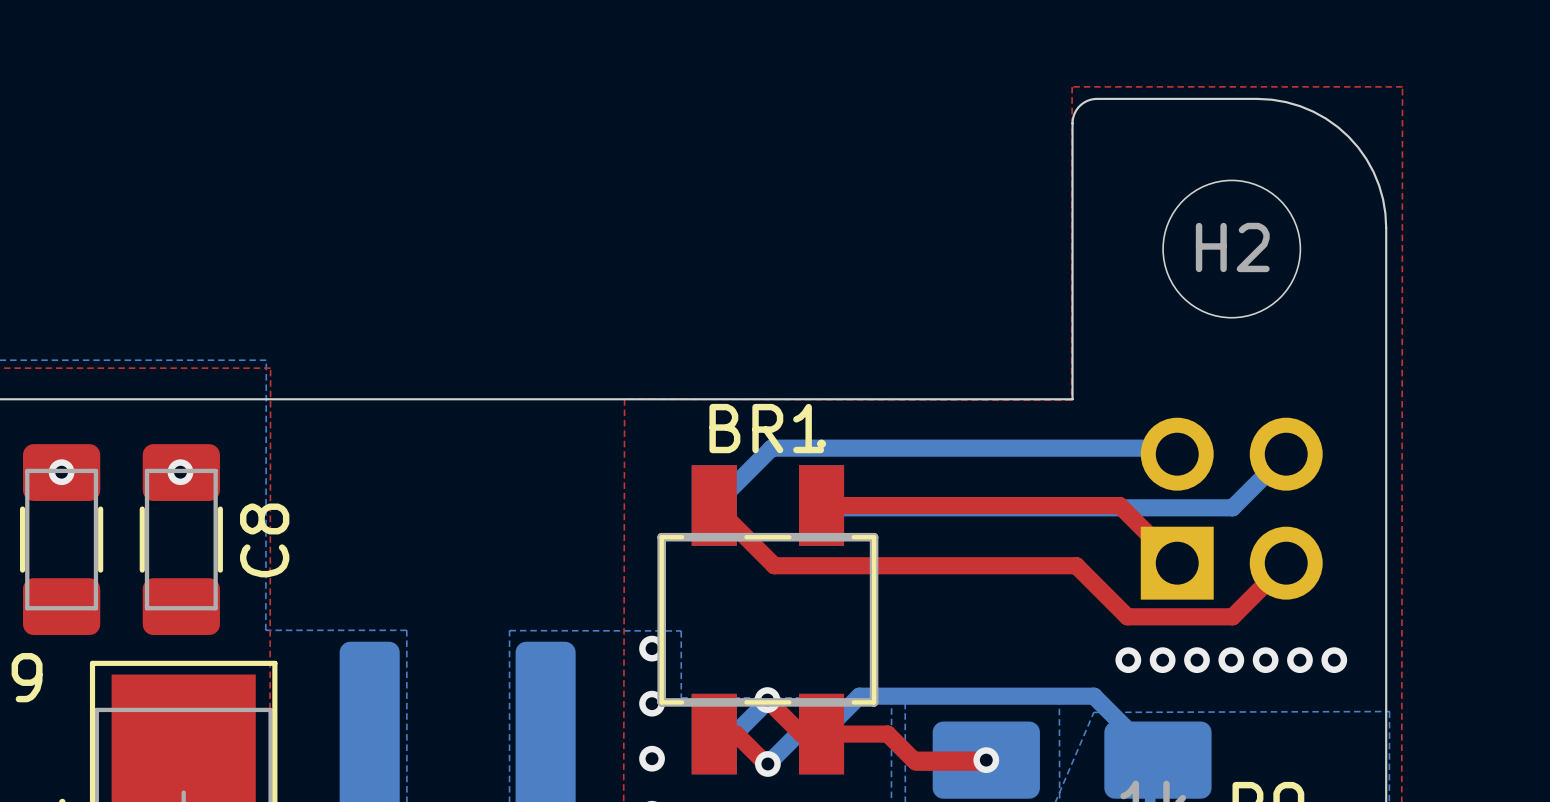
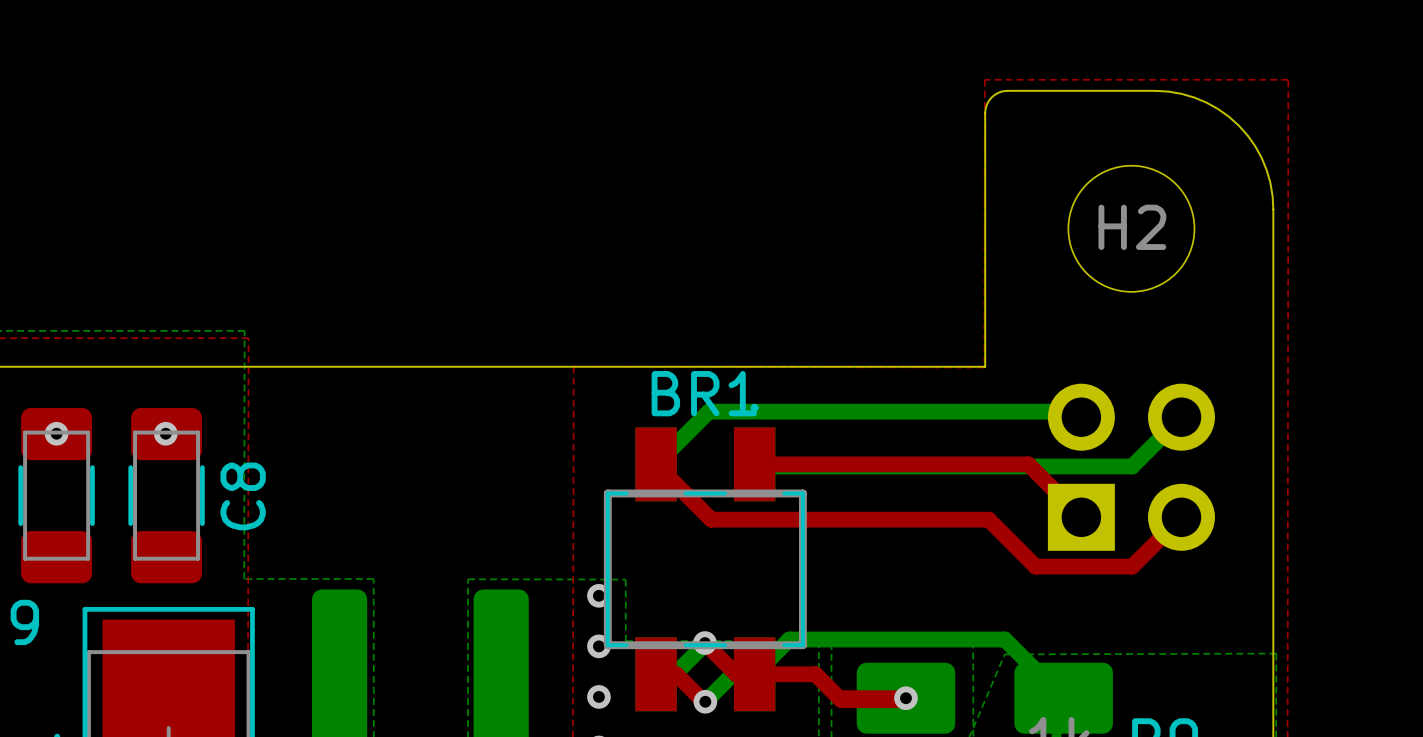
via: (1128, 660) -> none
via: (1162, 660) -> none
via: (1196, 660) -> none
via: (1231, 660) -> none
via: (1265, 660) -> none
via: (1299, 660) -> none
via: (1334, 660) -> none

